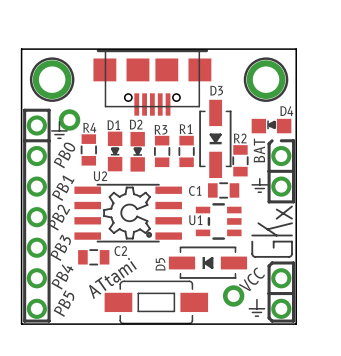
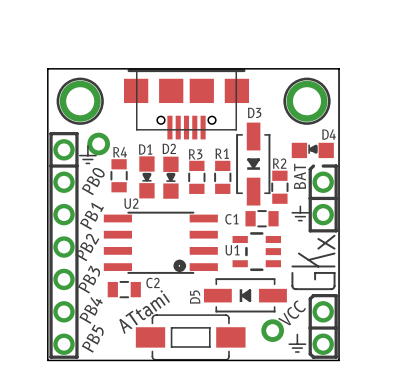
drawing: [103, 186, 151, 240] -> none
drawing: none -> [173, 259, 186, 273]

